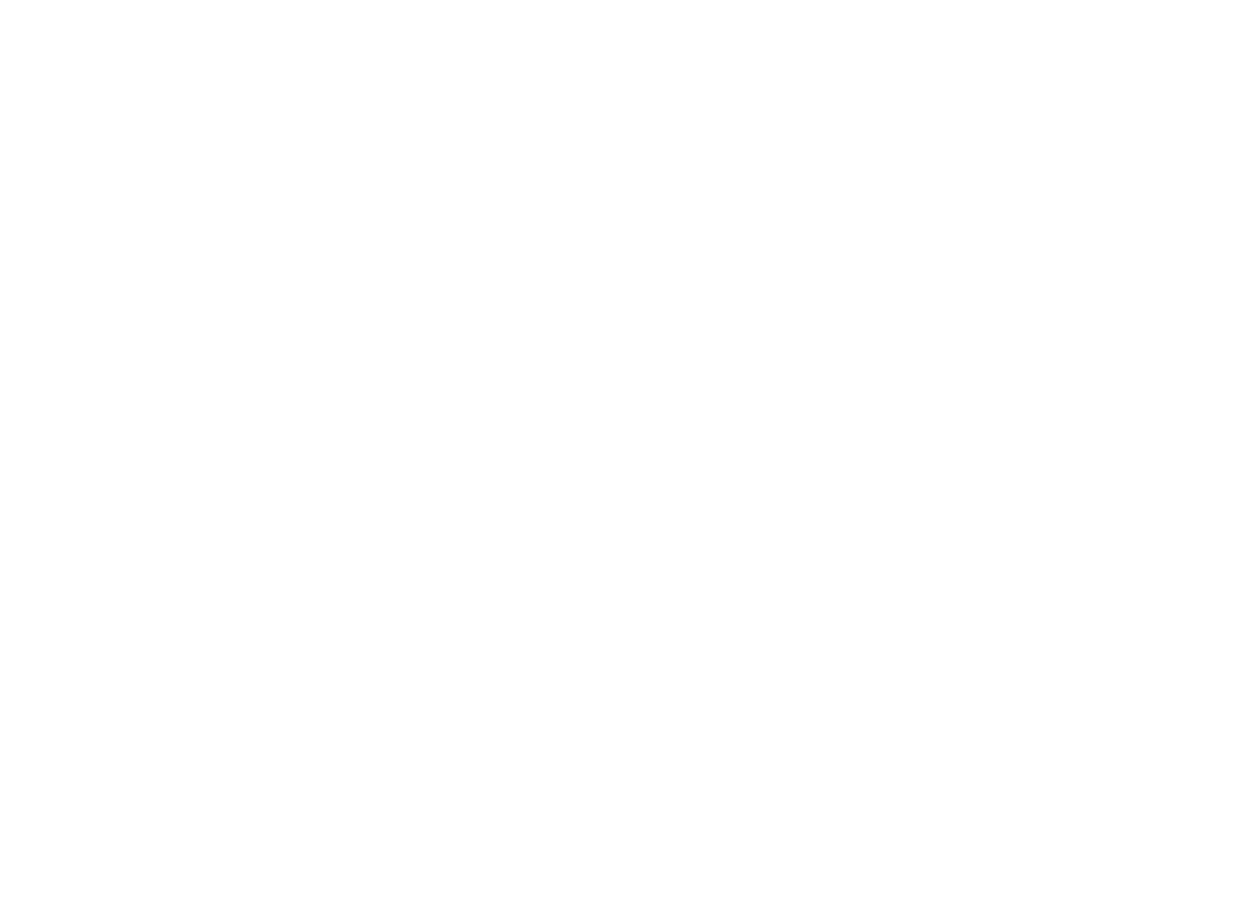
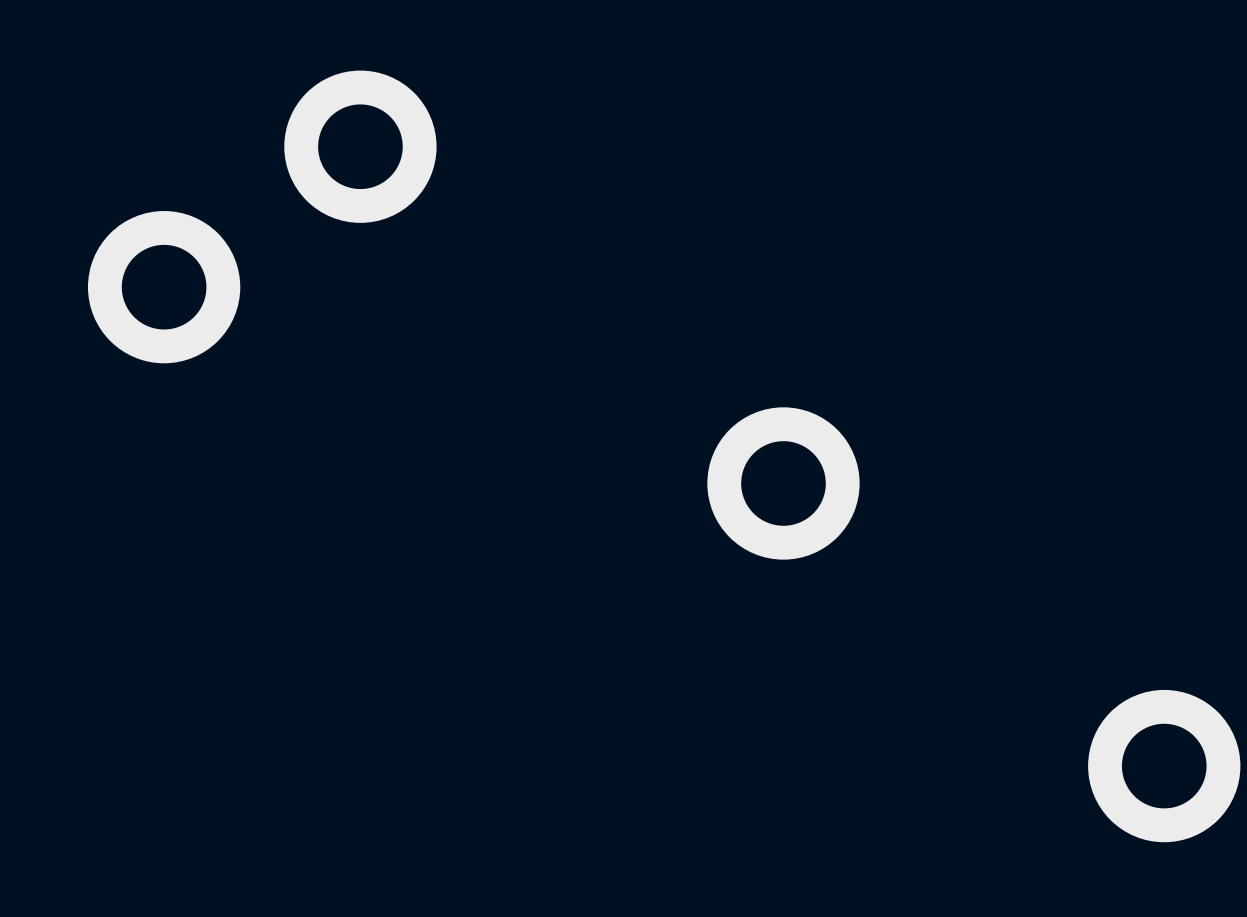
via: none -> (360, 146)
via: none -> (164, 287)
via: none -> (783, 483)
via: none -> (1164, 766)

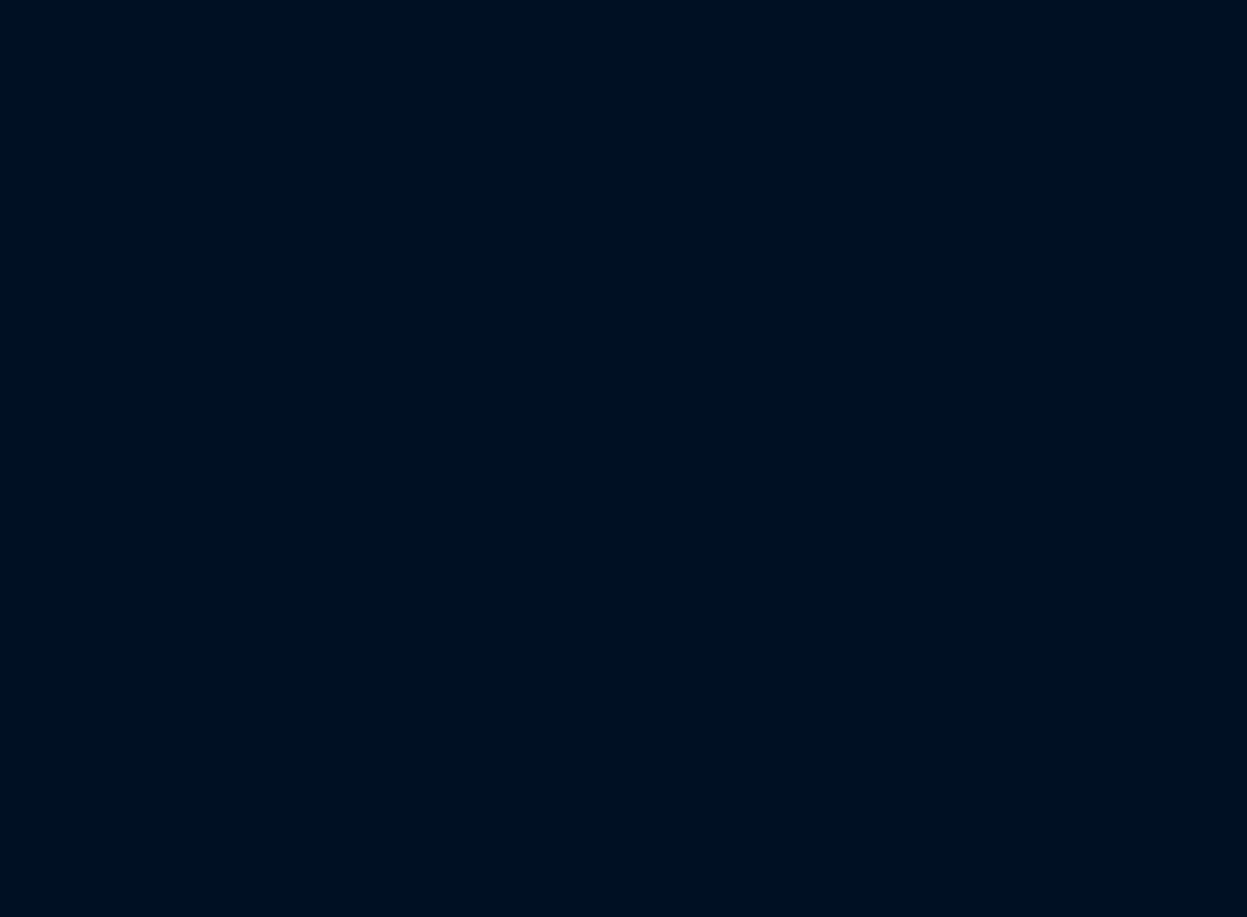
via: (360, 146) -> none
via: (164, 287) -> none
via: (783, 483) -> none
via: (1164, 766) -> none

